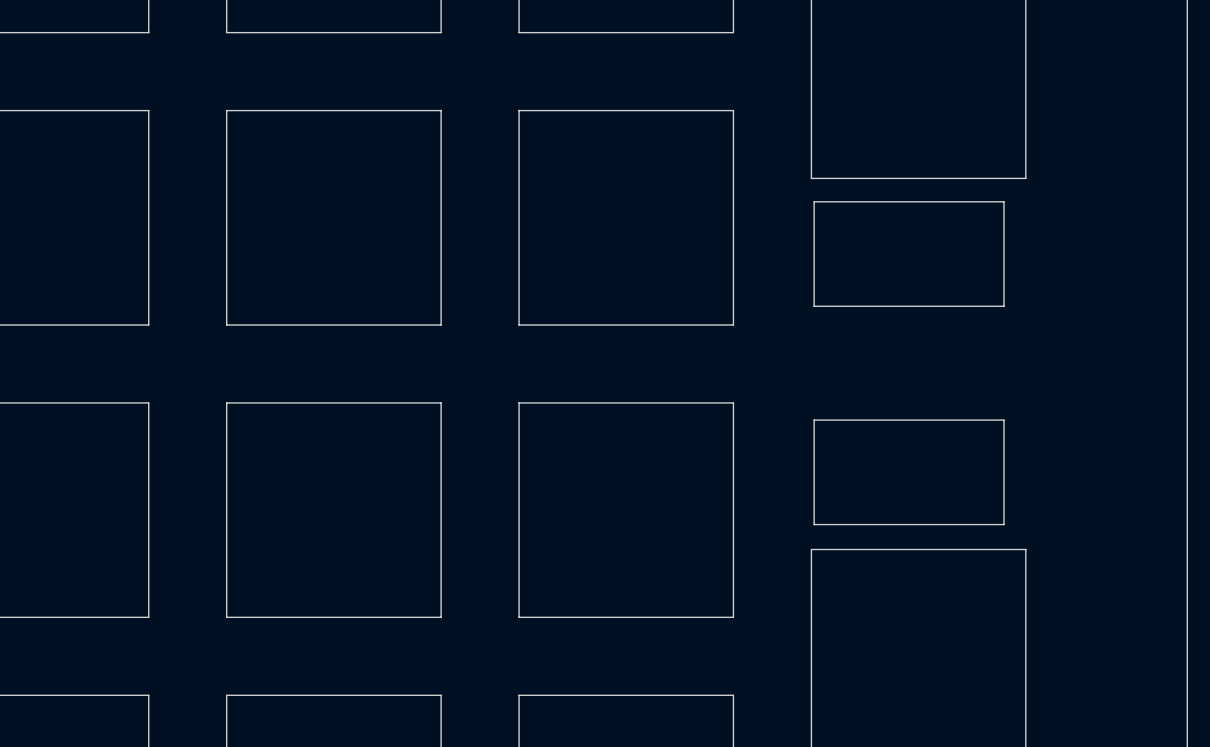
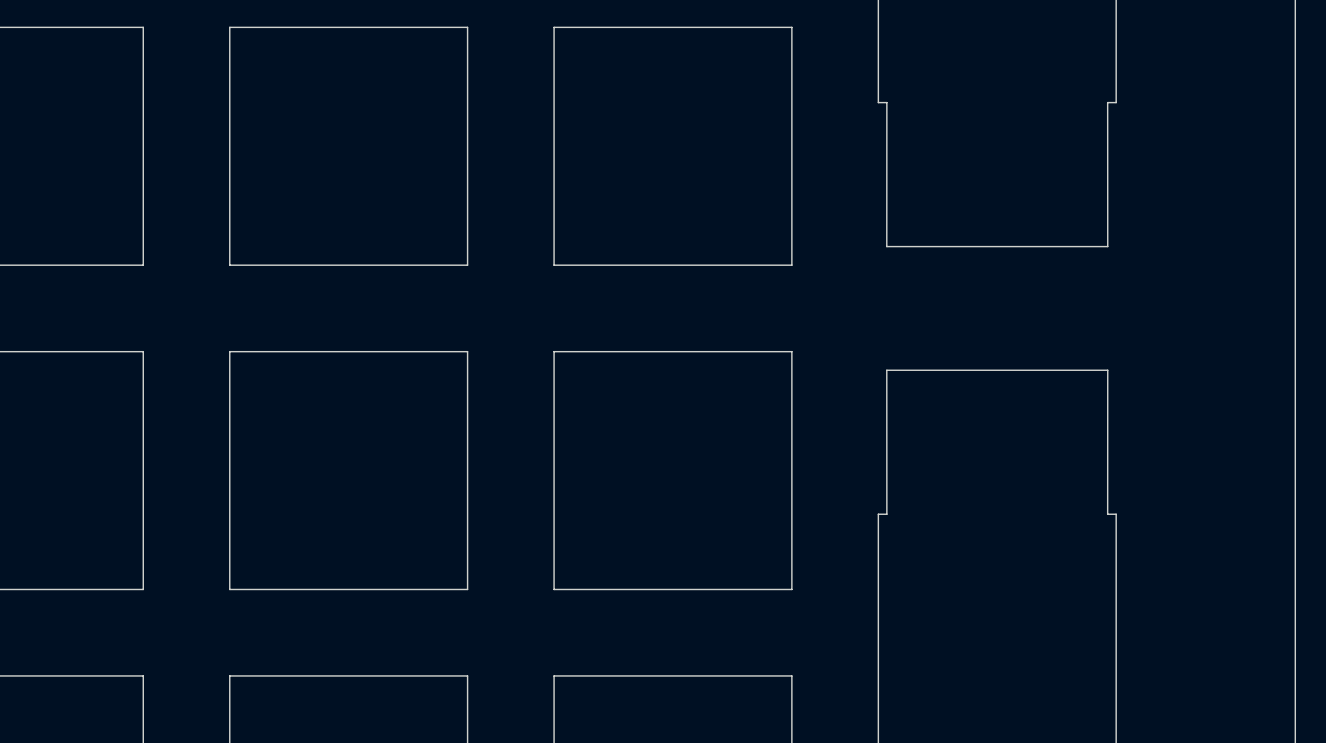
board edge: (819, 178) (1018, 178) -> (886, 102) (886, 246) (1107, 246) (1107, 102)
board edge: (814, 201) (814, 306) (1003, 306) (1003, 201) (814, 201) -> none
board edge: (814, 420) (814, 524) (1003, 524) (1003, 420) (814, 420) -> none
board edge: (819, 549) (1018, 549) -> (886, 514) (886, 370) (1107, 370) (1107, 514)

